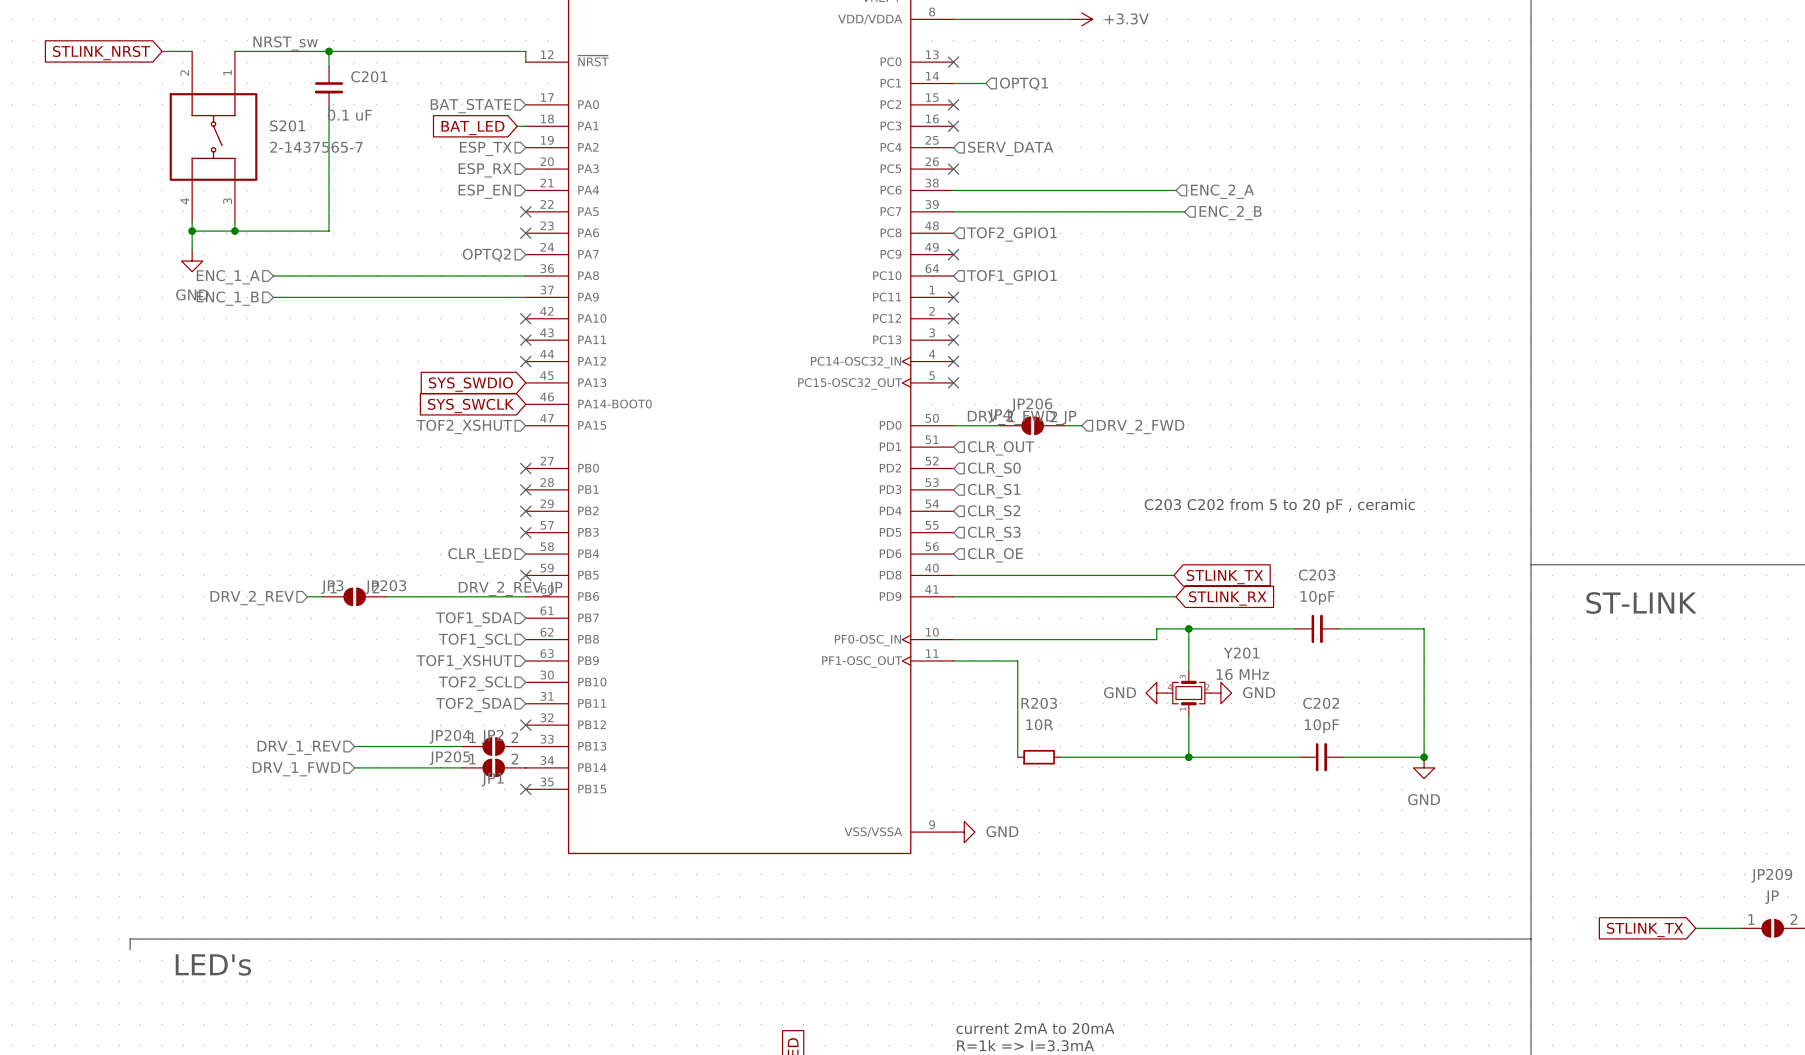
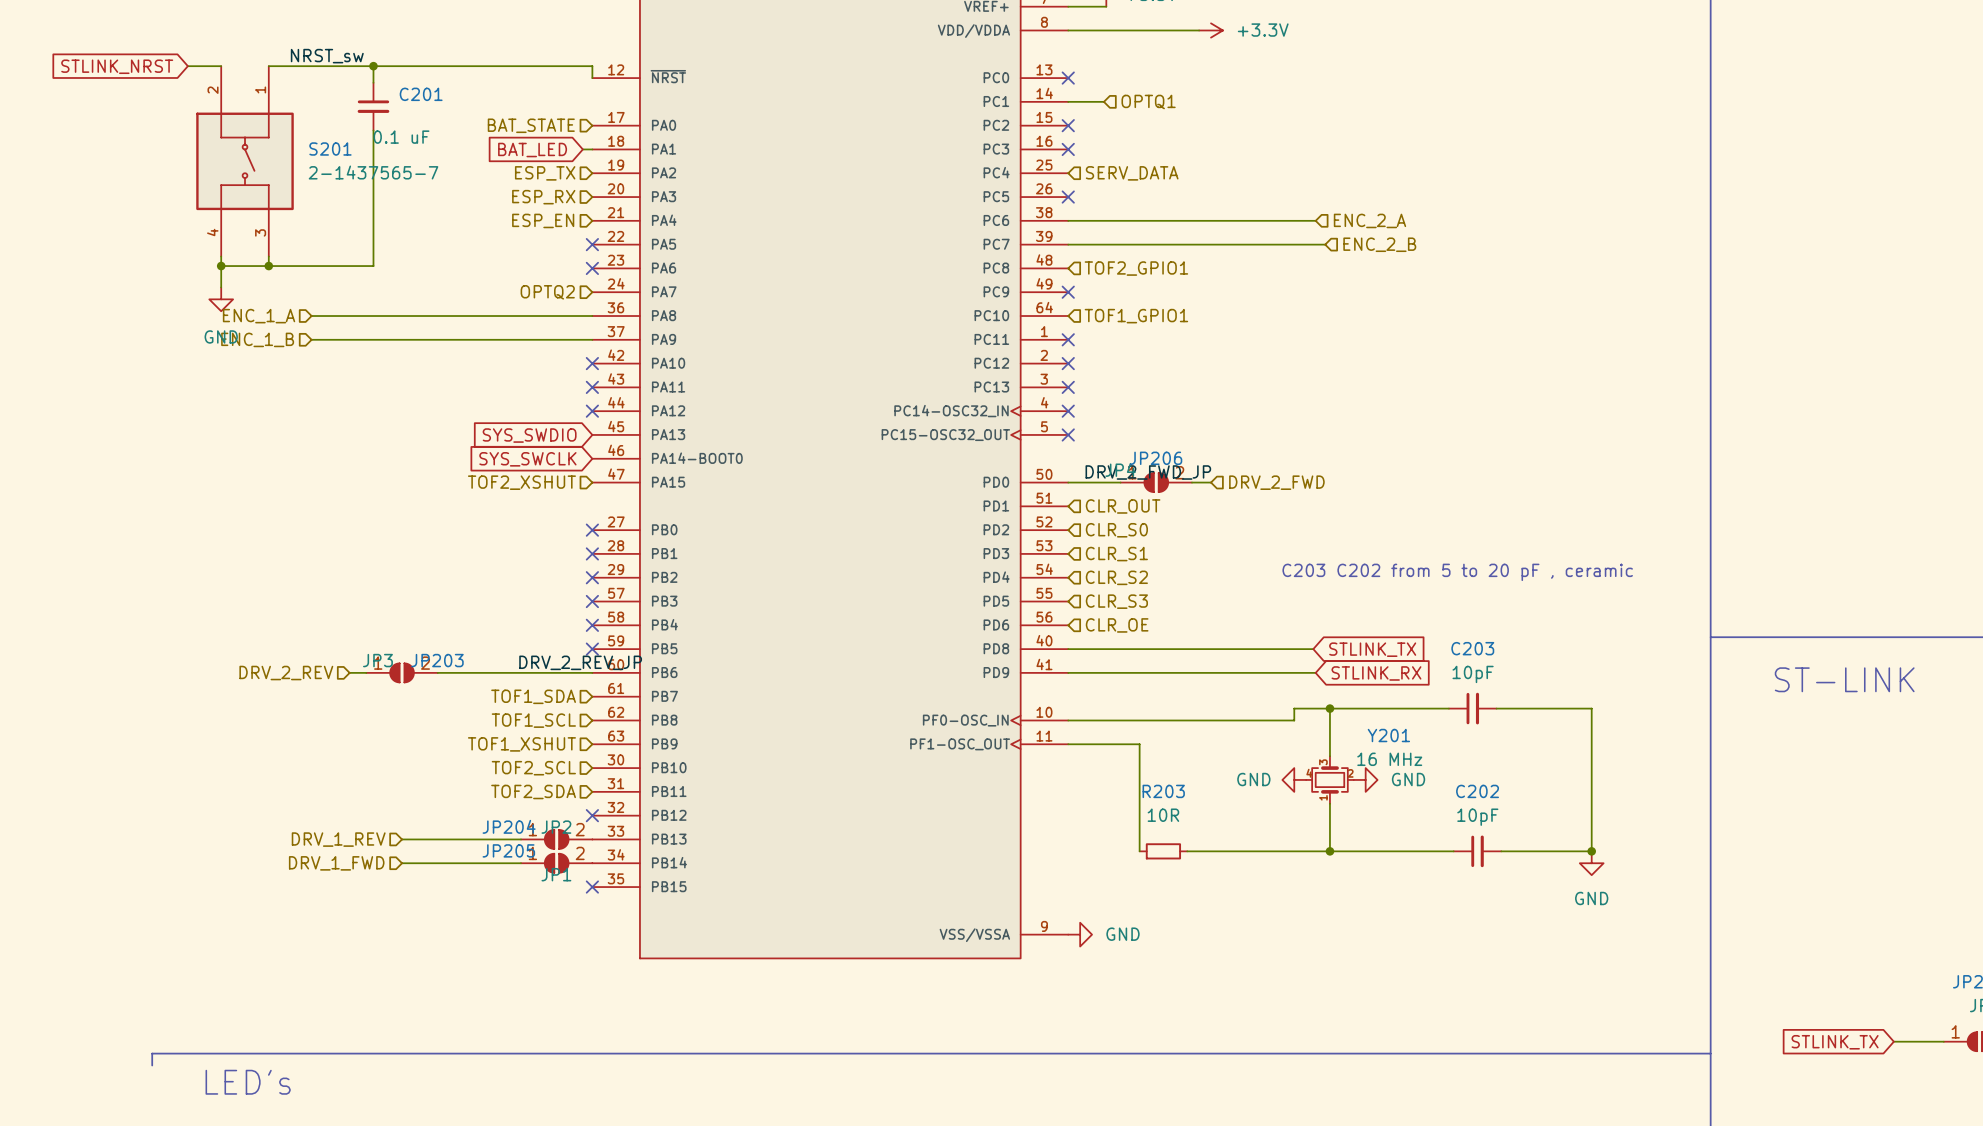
no-connect mark: none -> (592, 625)
hierarchical label: CLR_LED (479, 555) -> none

